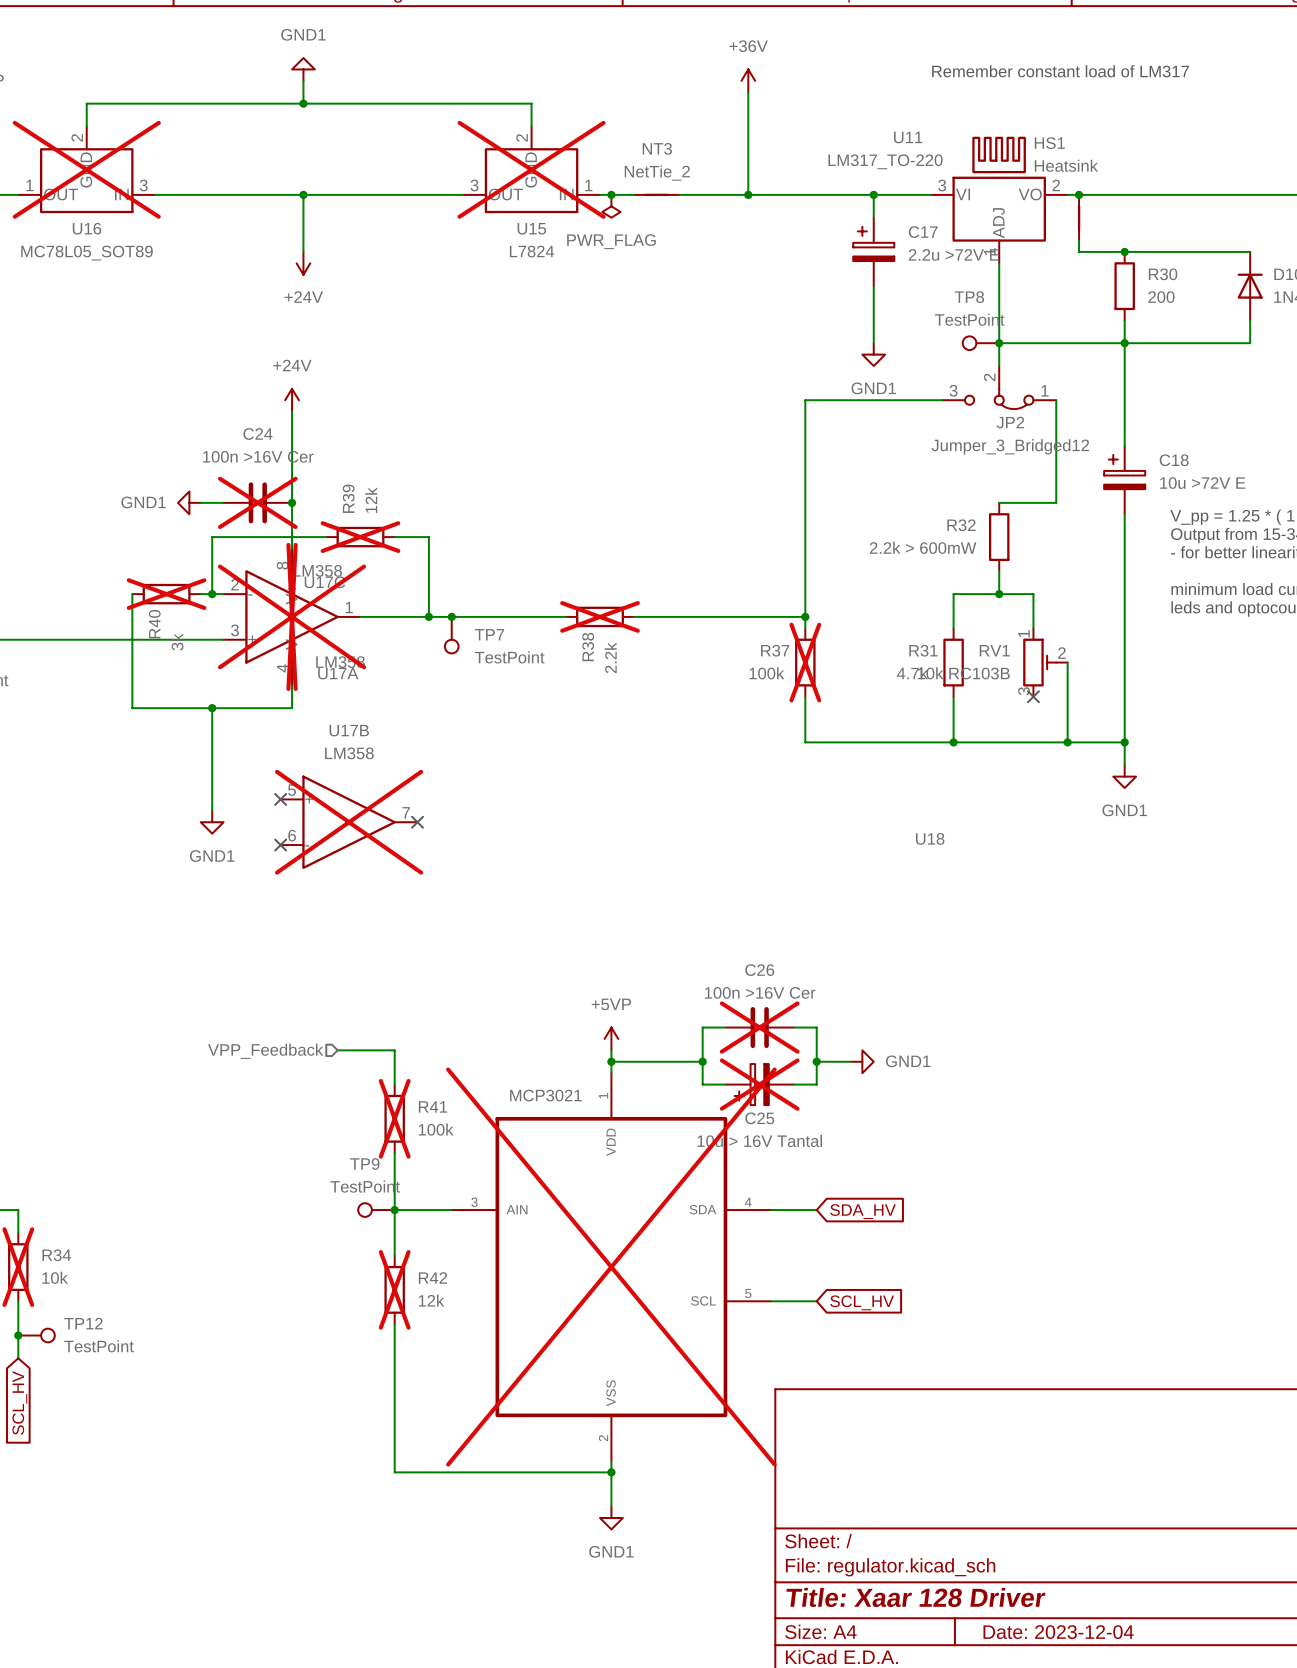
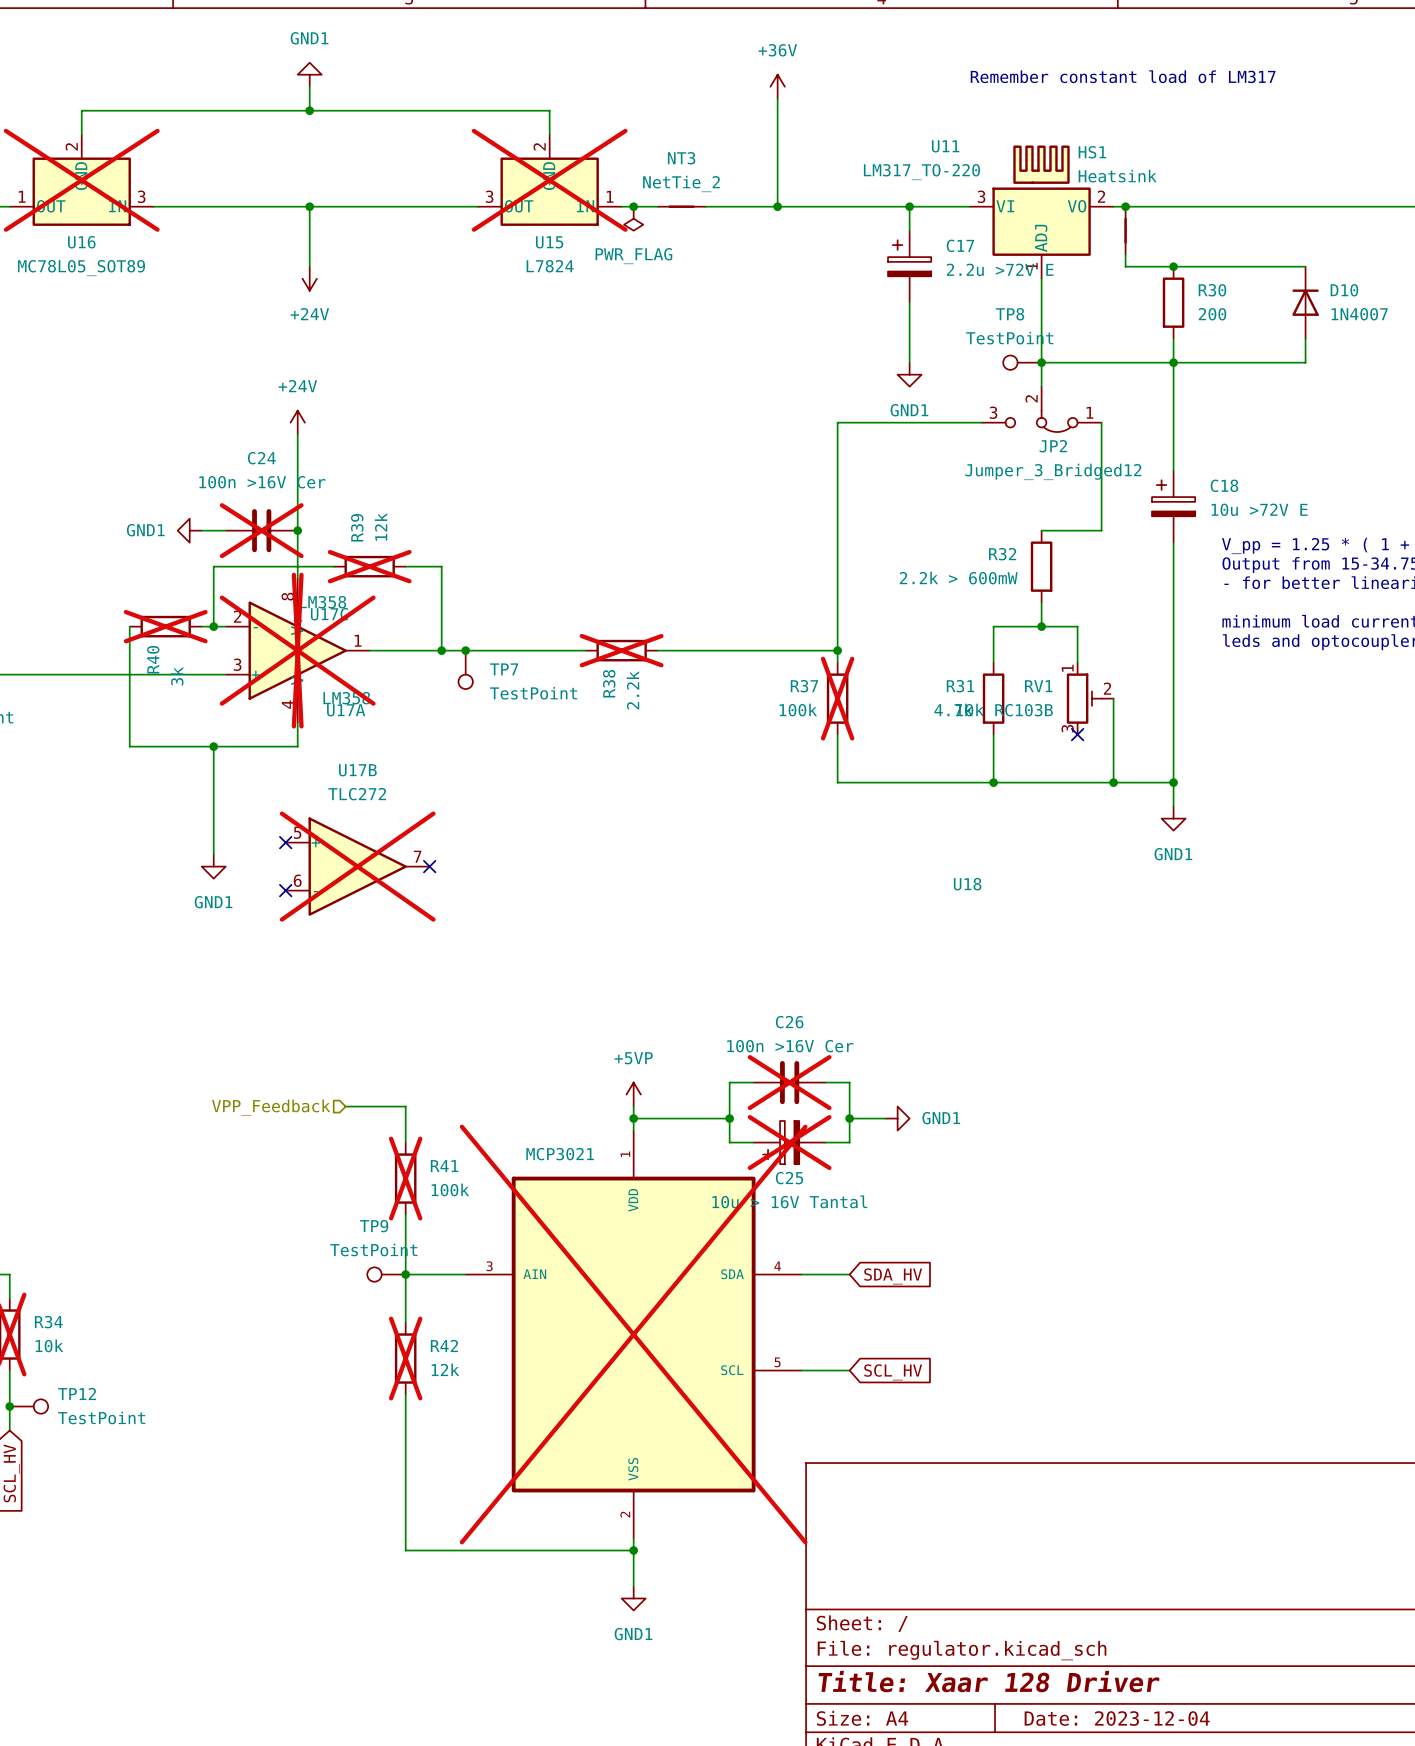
U17B value: LM358 (349, 753) -> TLC272 (357, 794)

